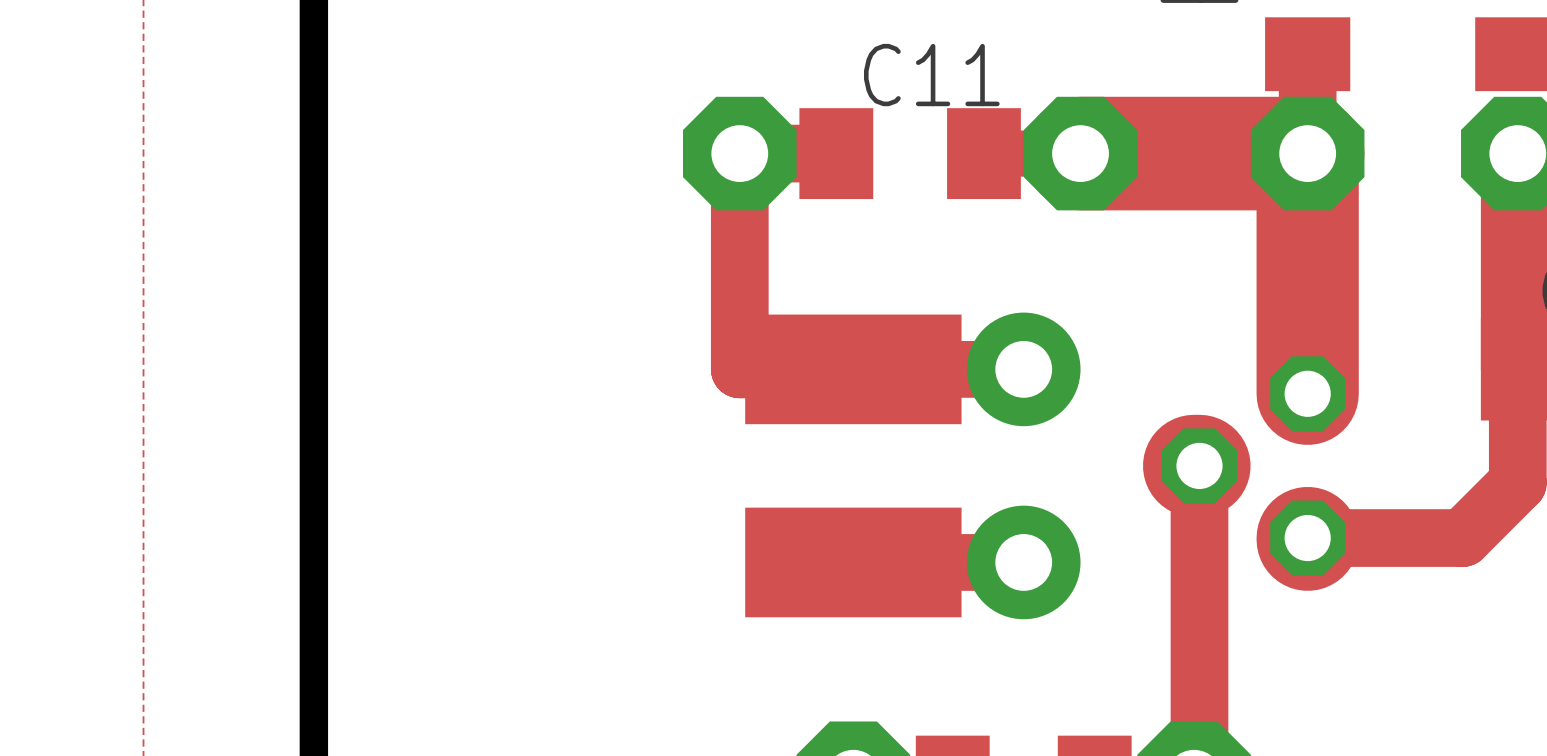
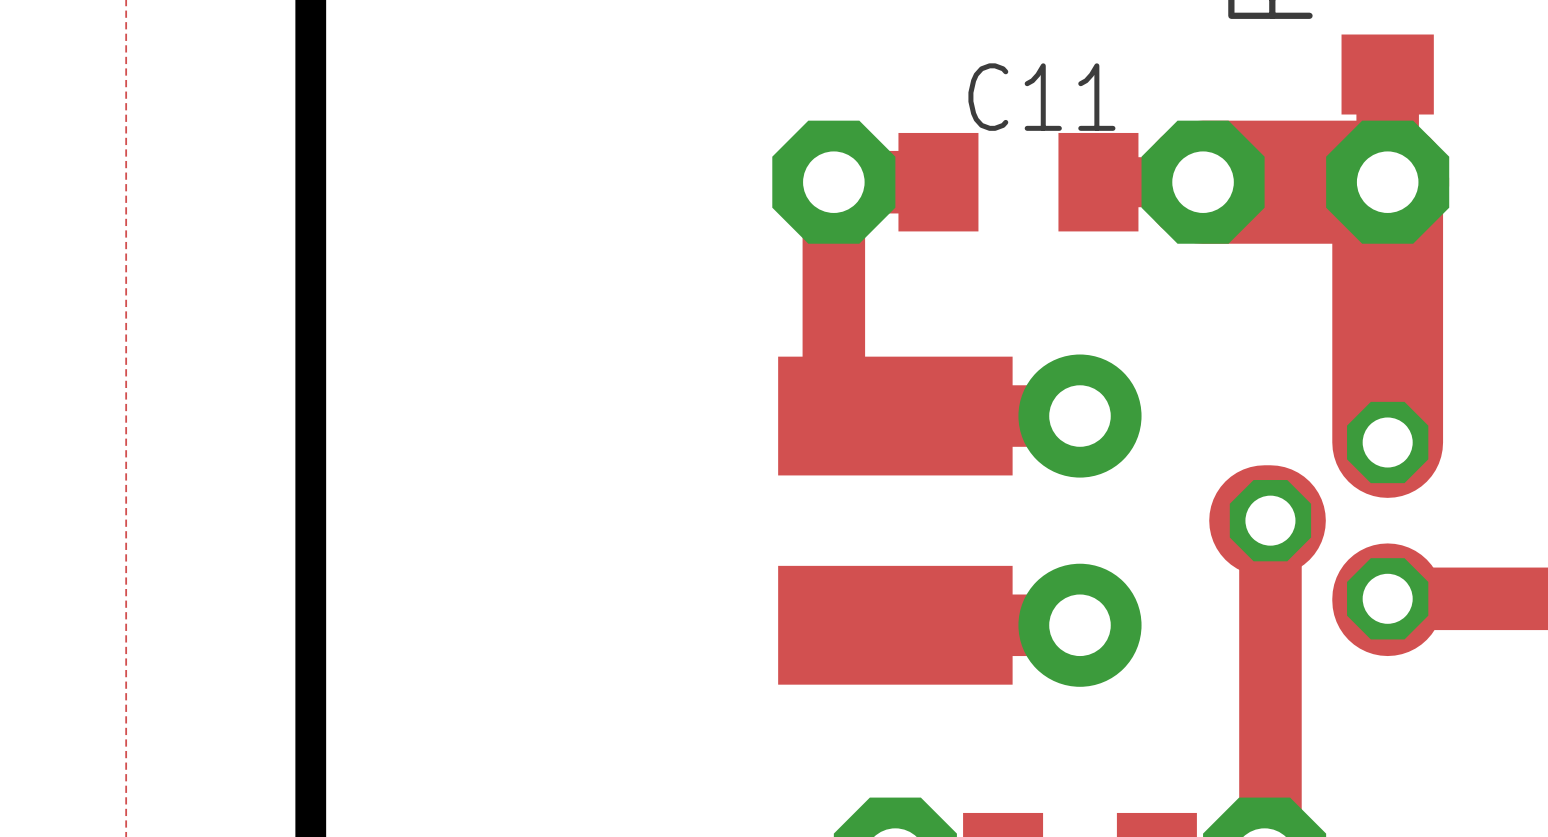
track: (796, 153) (739, 153) (739, 369) (796, 369) -> (833, 182) (833, 416)
C11 position: (910, 153) -> (1018, 182)

